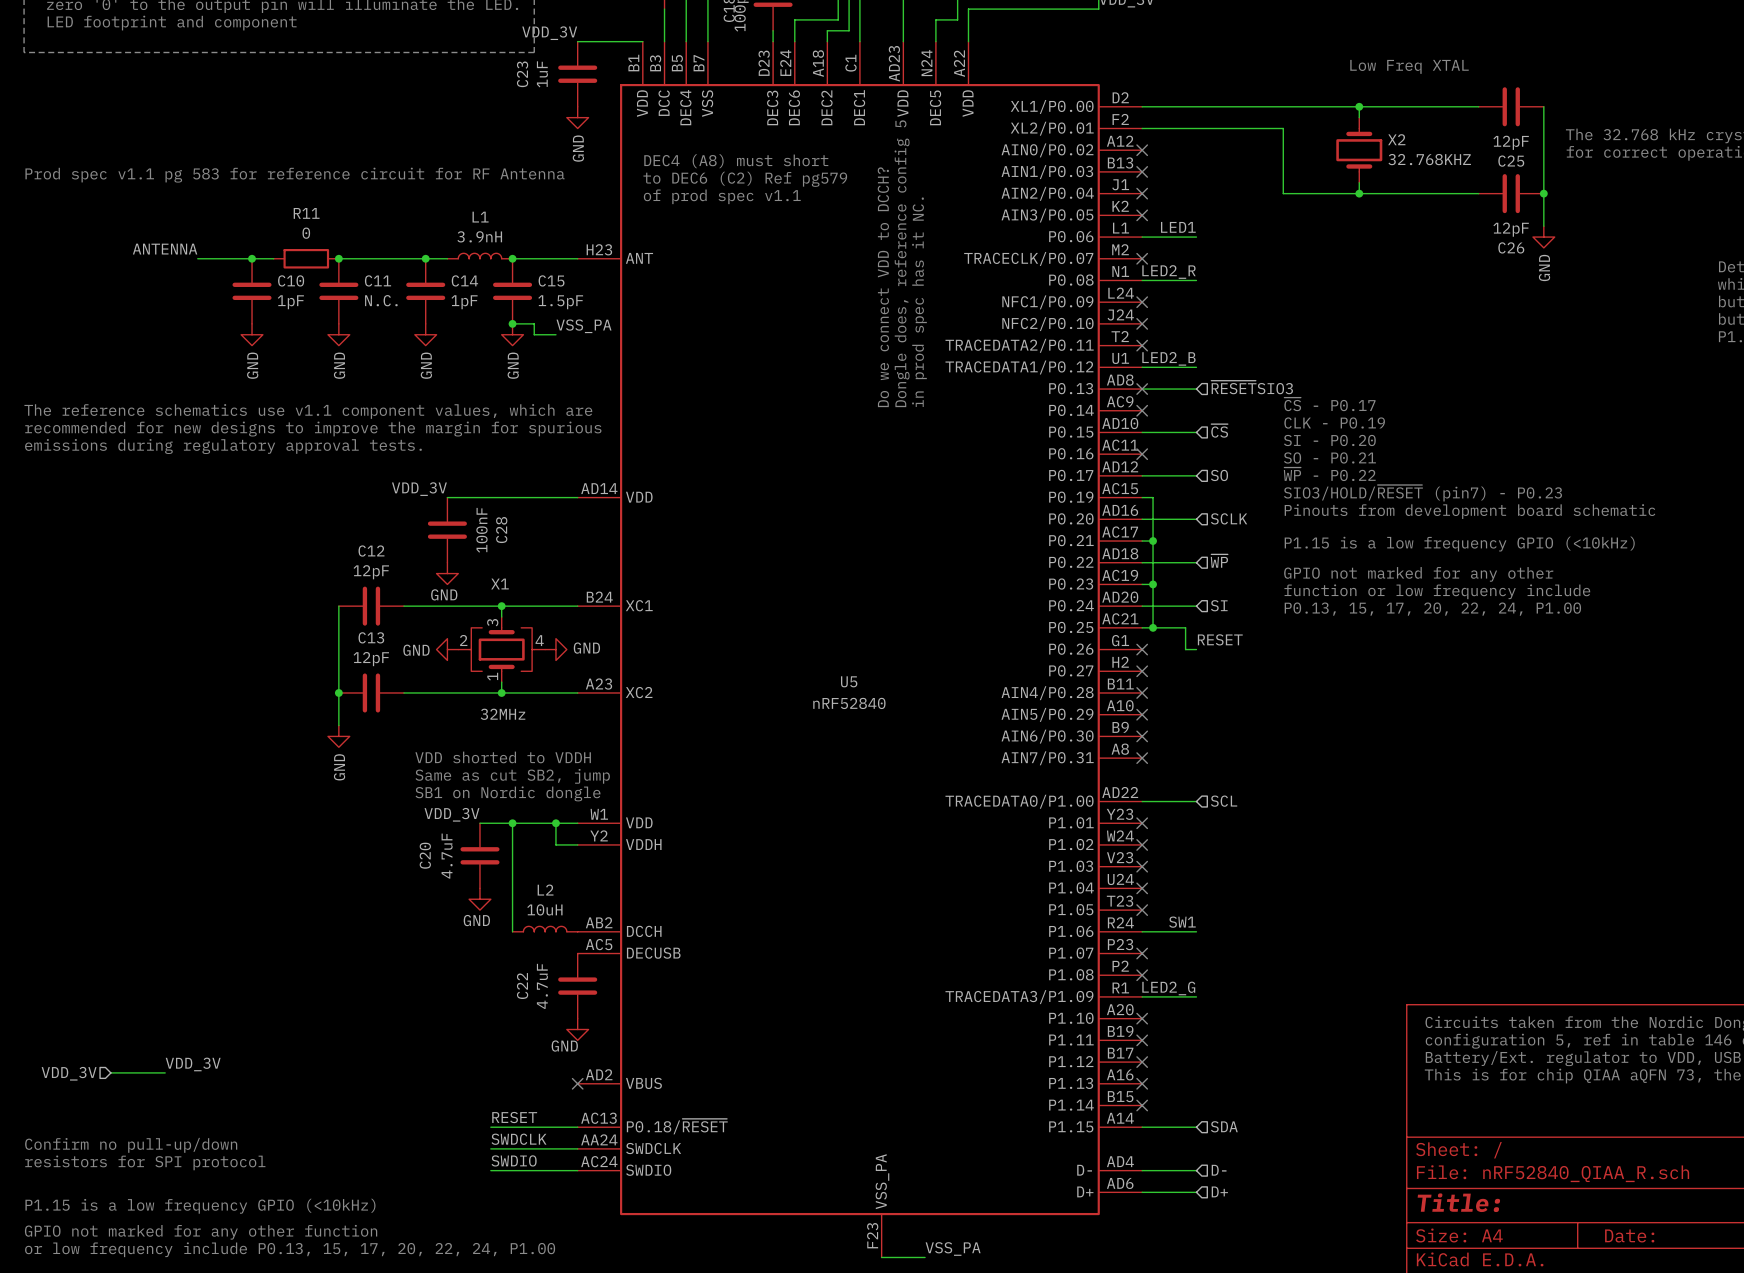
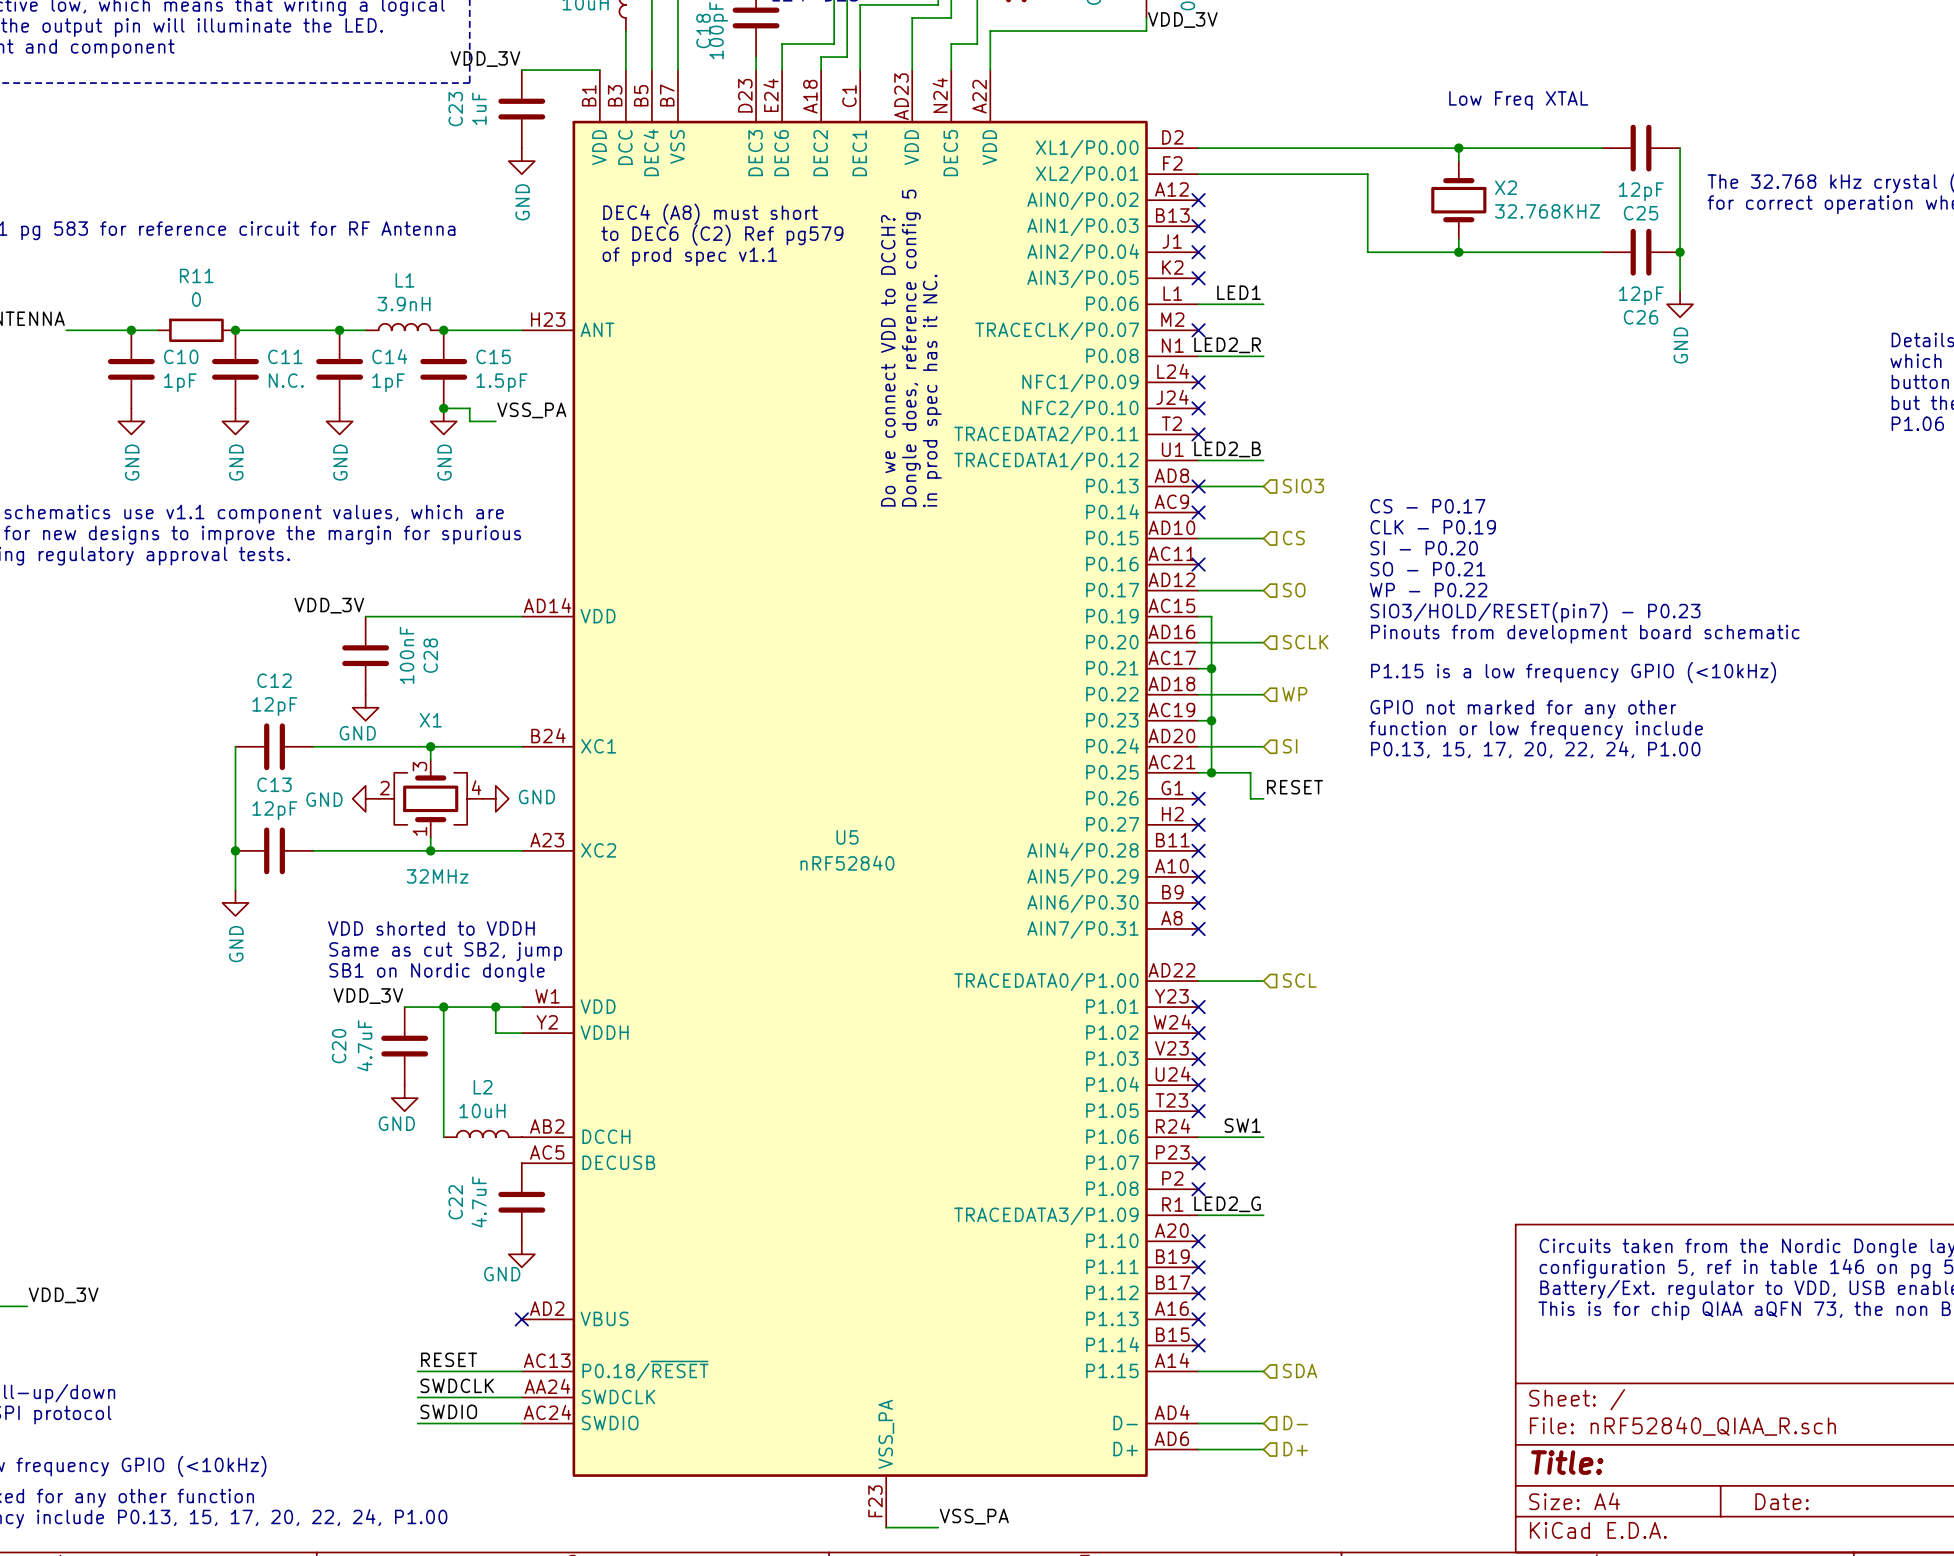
hierarchical label: ~{RESET}SIO3 (1252, 387) -> SIO3 (1303, 486)
text: ~{CS} - P0.17 (1329, 404) -> CS - P0.17 (1427, 506)
hierarchical label: ~{CS} (1219, 430) -> CS (1293, 538)
text: ~{WP} - P0.22 (1329, 474) -> WP - P0.22 (1428, 590)
text: SIO3/HOLD/~{RESET} (pin7) - P0.23 (1422, 493) -> SIO3/HOLD/RESET(pin7) - P0.23 (1535, 612)
hierarchical label: ~{WP} (1219, 561) -> WP (1294, 694)

